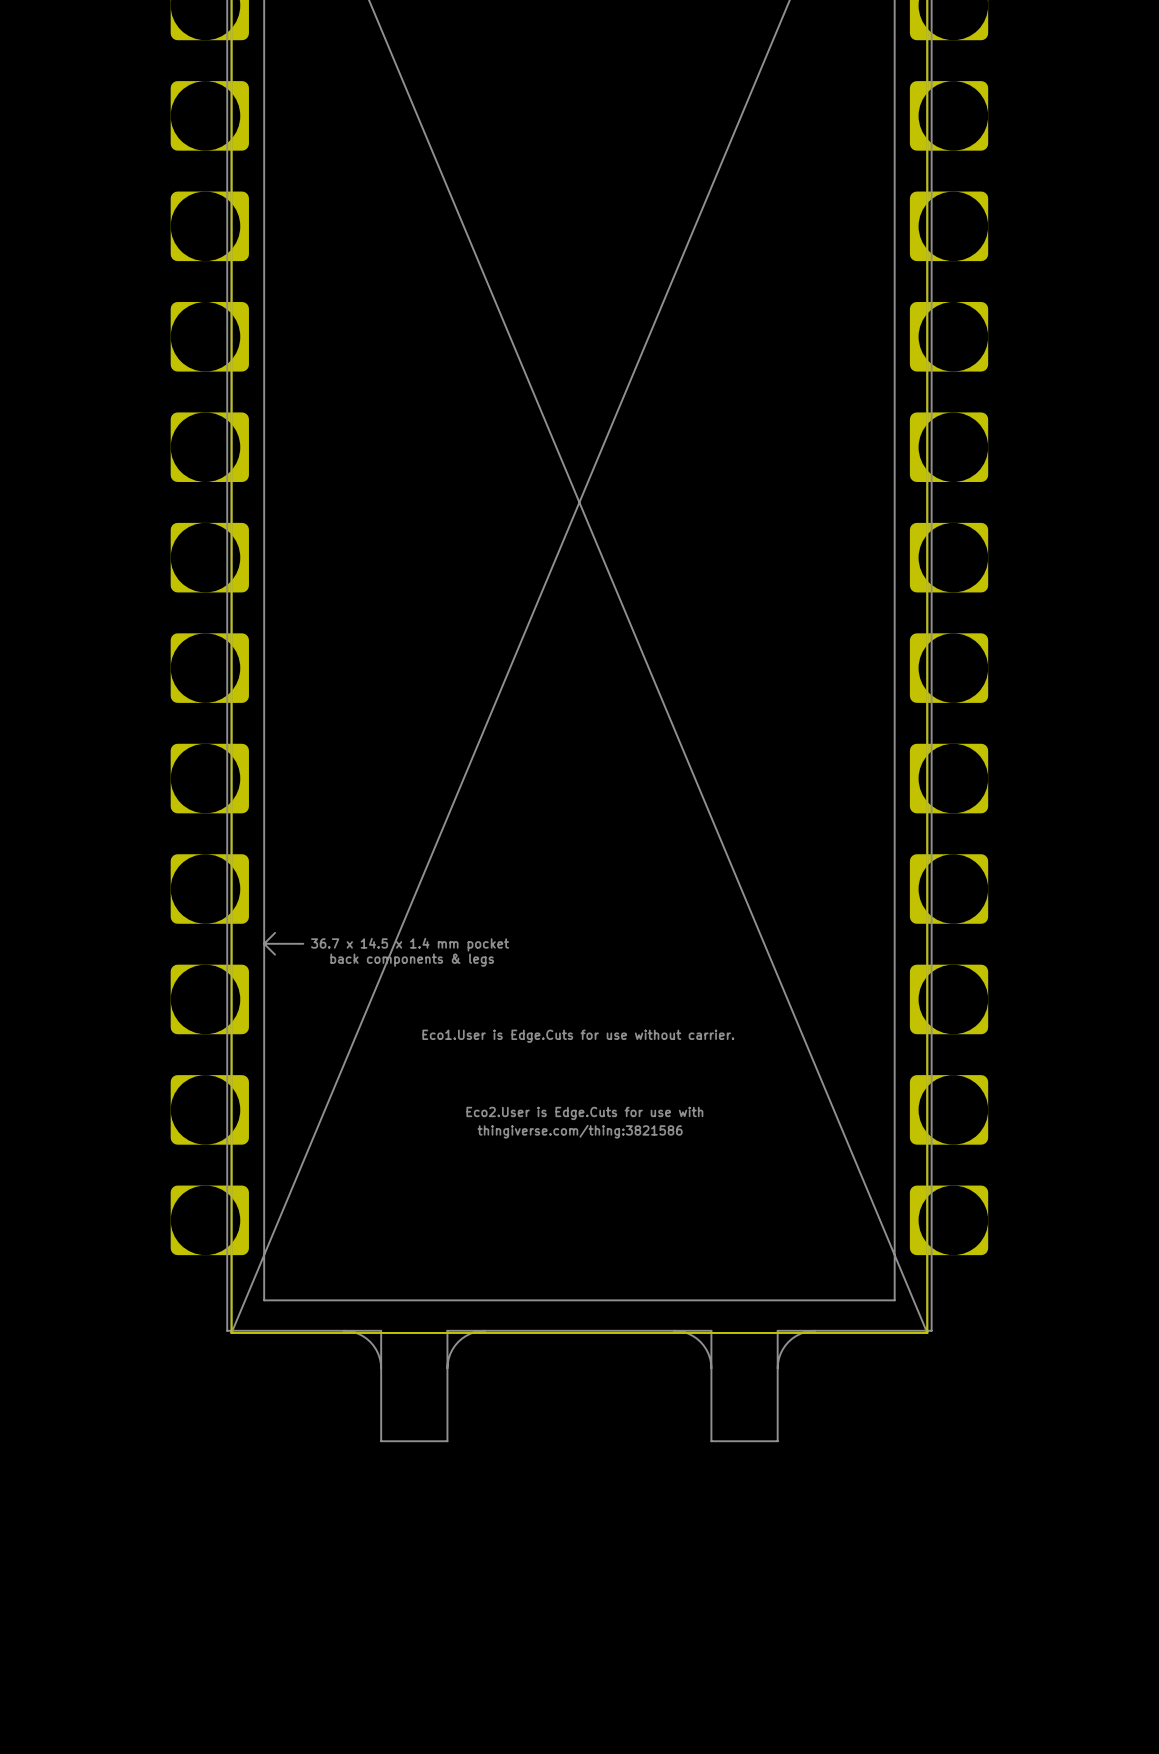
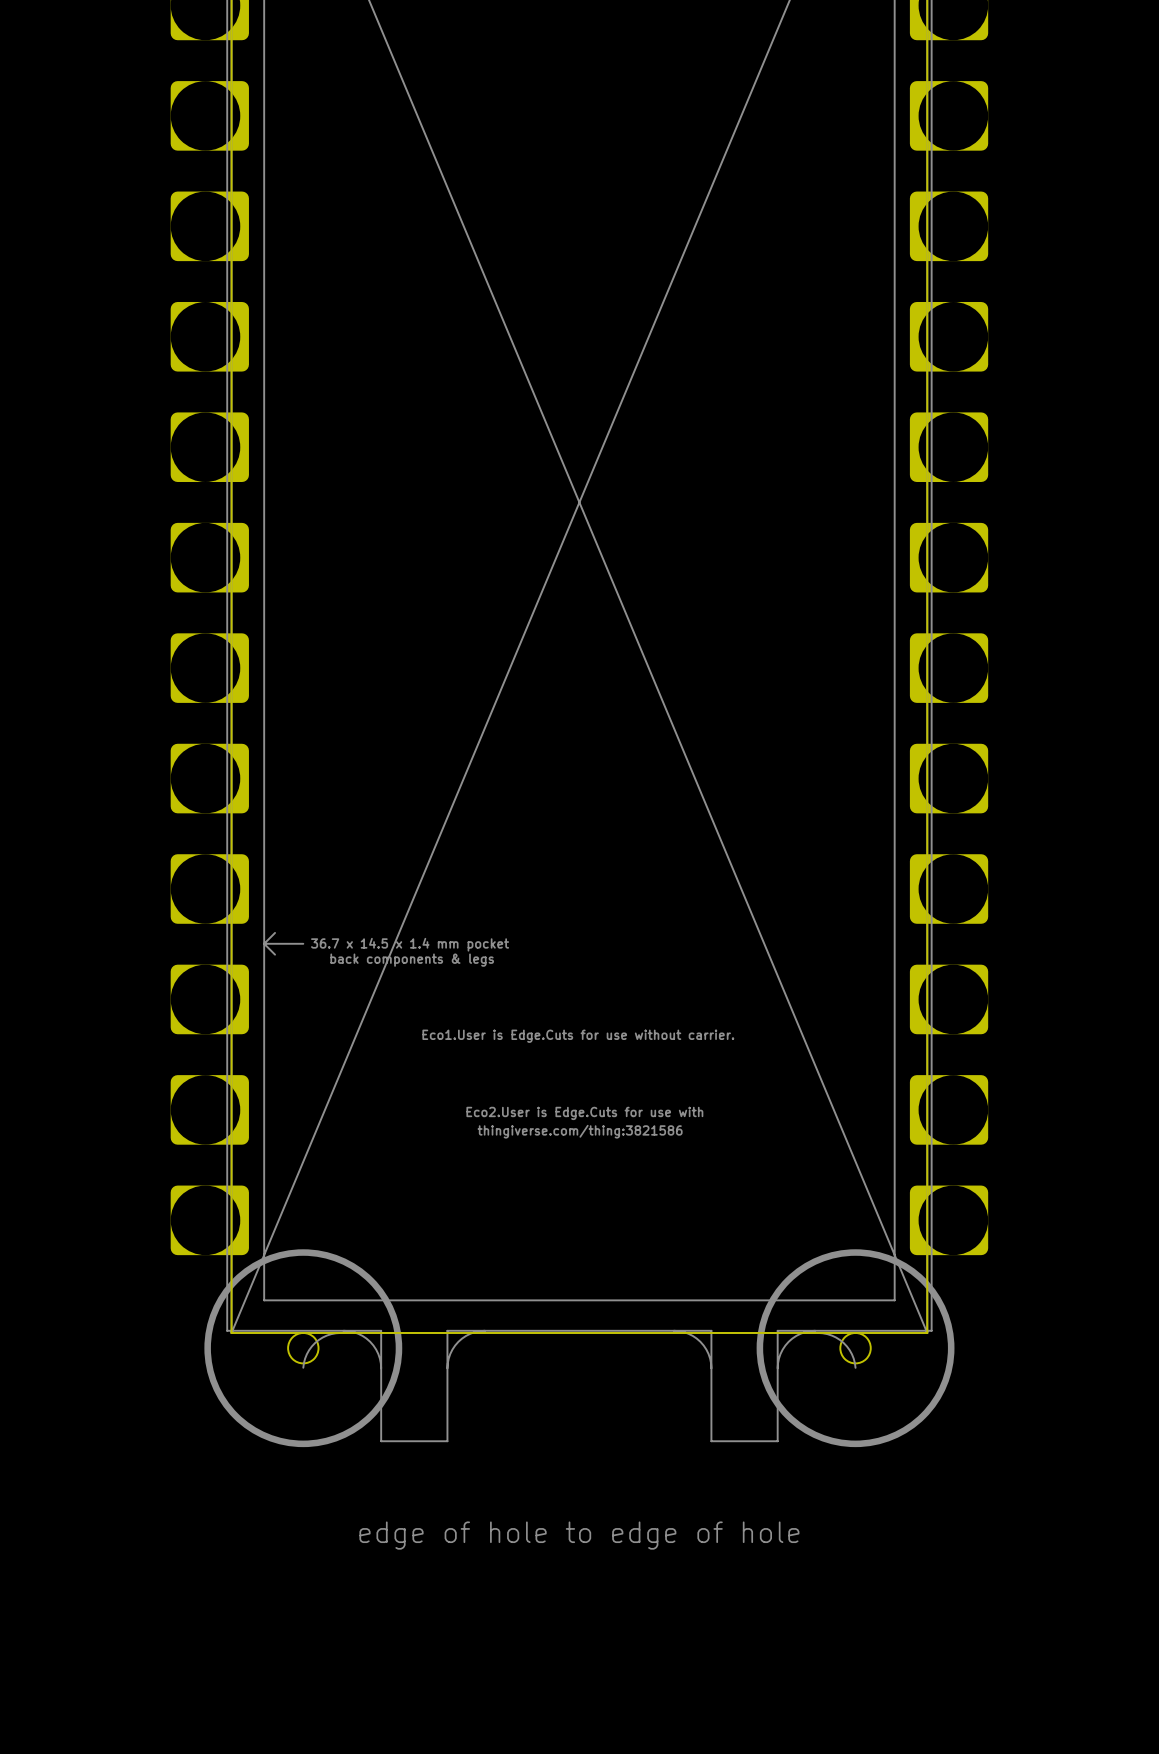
line: none -> (340, 1332) (326, 1335) (315, 1343) (306, 1354) (303, 1367)
line: none -> (818, 1332) (831, 1335) (843, 1343) (851, 1354) (855, 1367)
part: none -> (303, 1348)
part: none -> (855, 1348)
text: none -> edge of hole to edge of hole (579, 1535)

